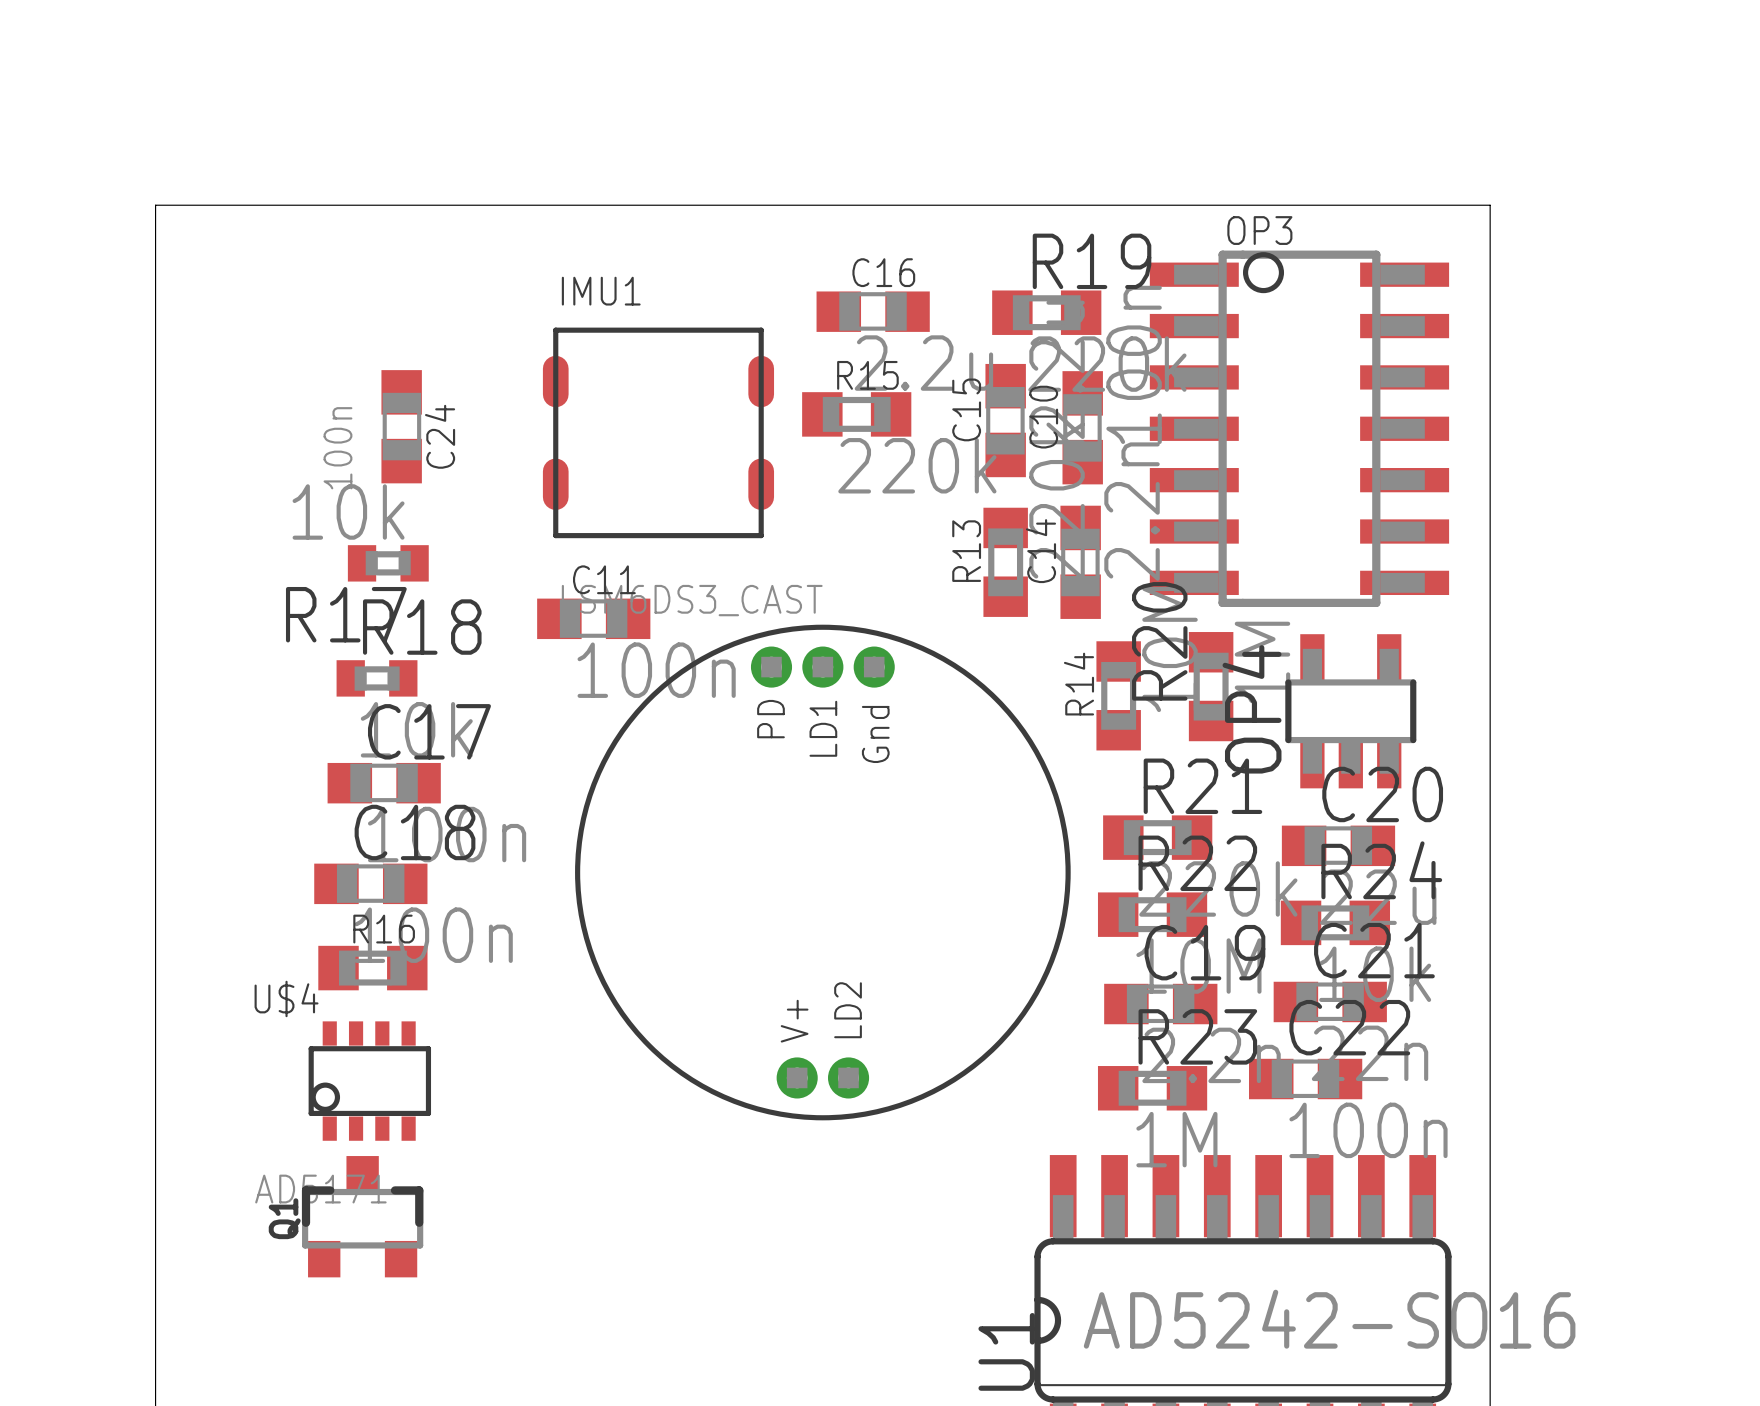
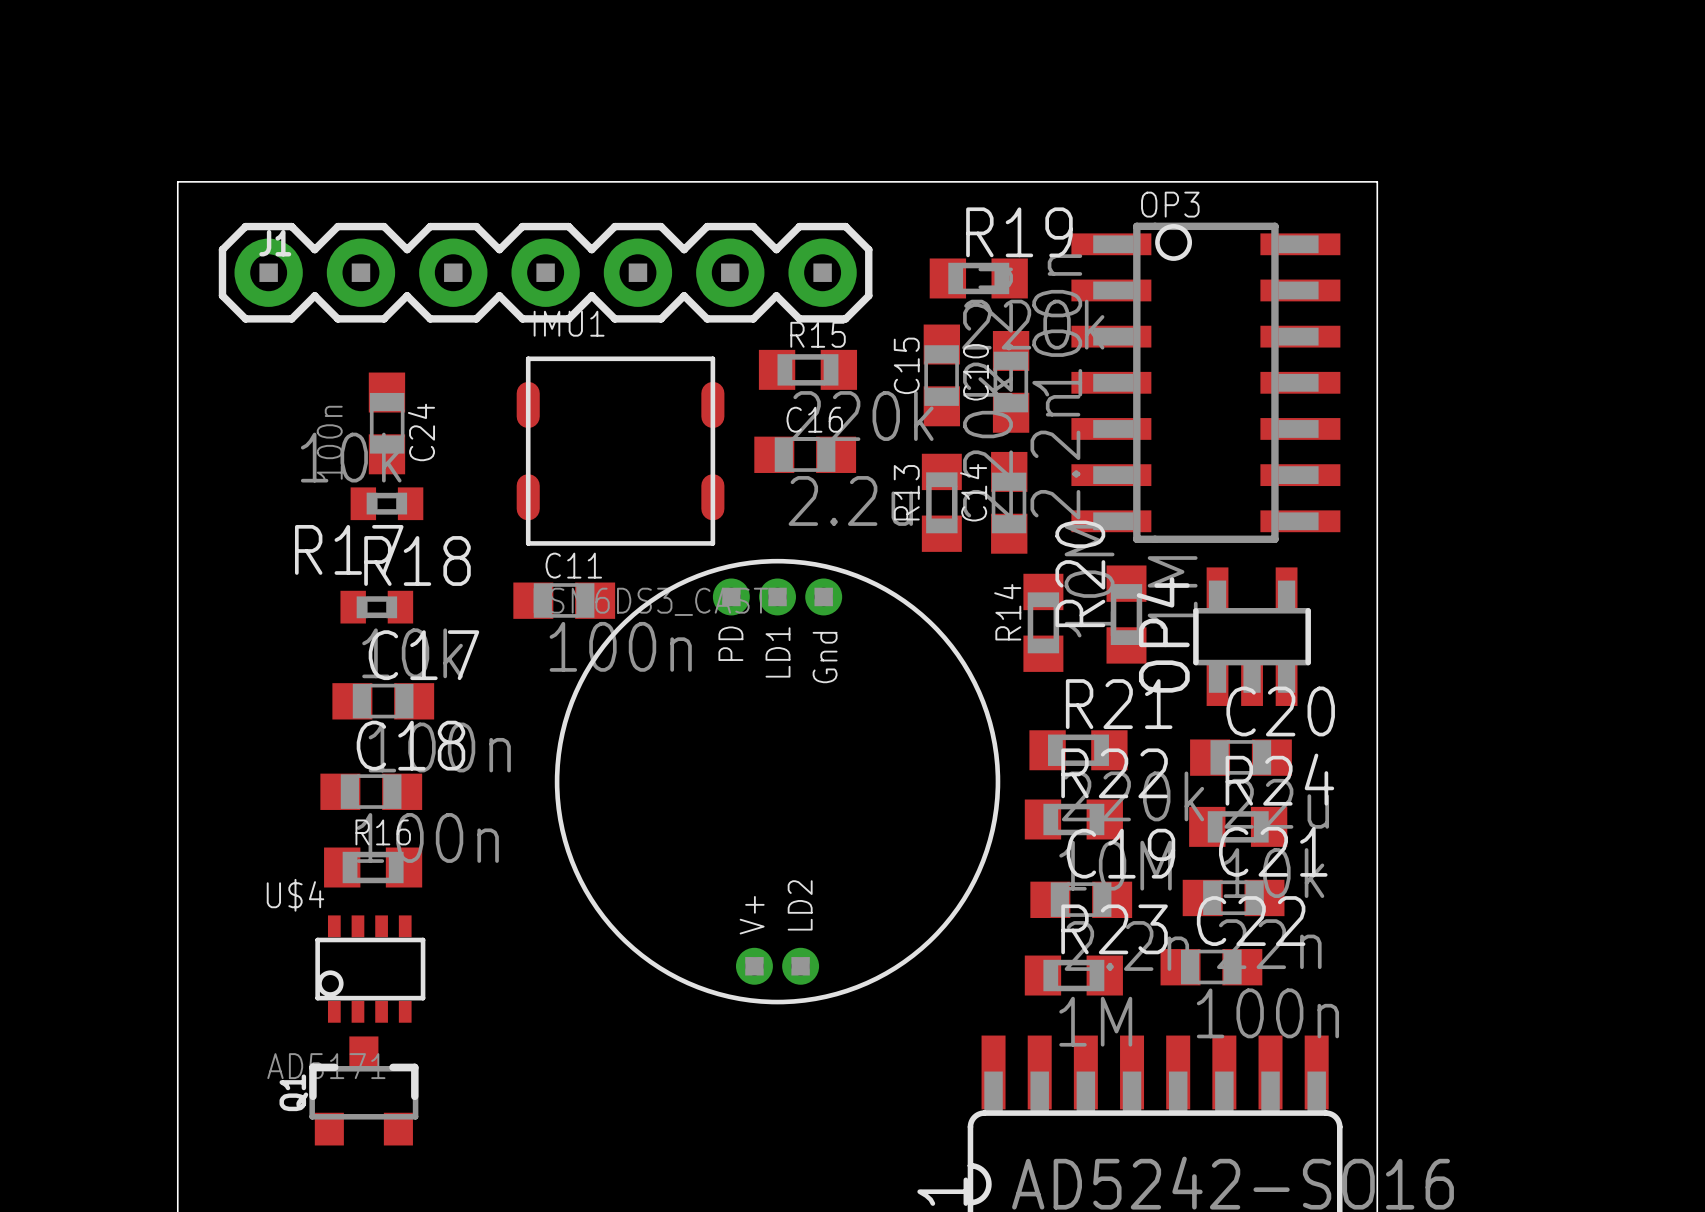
J1: none -> (545, 272)
C16 position: (873, 311) -> (805, 454)
C24 position: (401, 426) -> (386, 423)
IMU1 position: (658, 432) -> (620, 451)
C11 position: (593, 618) -> (564, 600)

